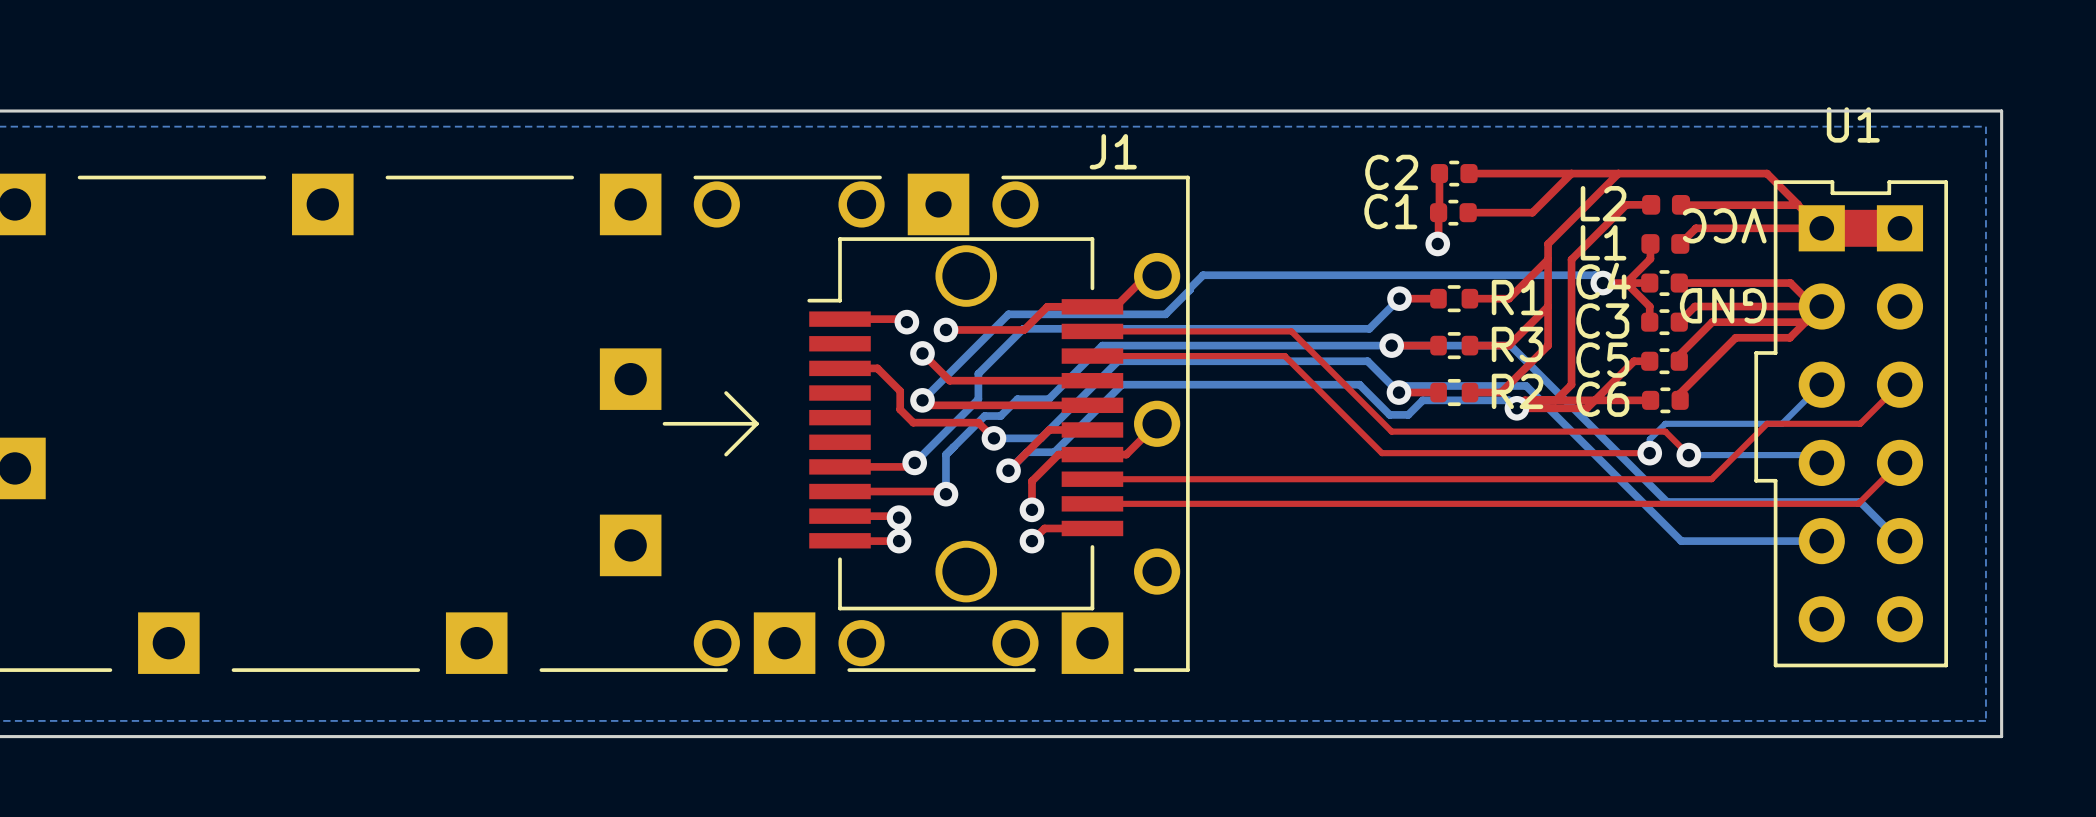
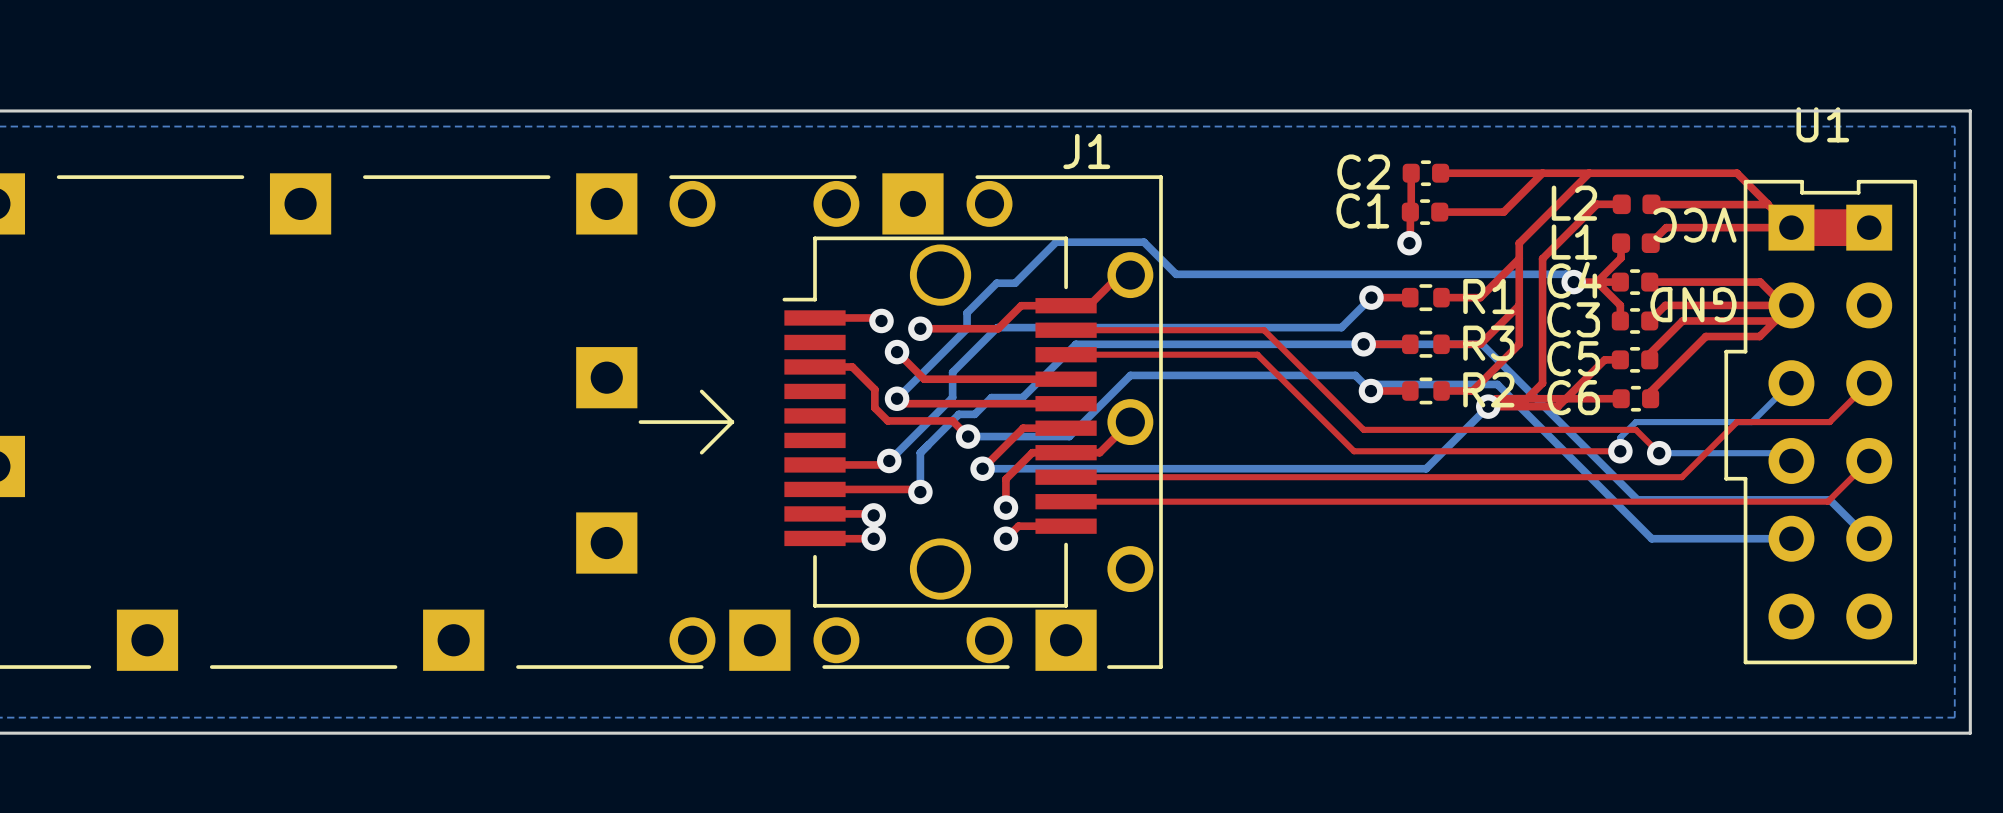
bottom track: (1203, 275) (1165, 314) (1008, 314) (992, 329) -> (1176, 274) (1144, 242) (1056, 242) (1015, 283) (996, 283) (967, 312) (967, 328)
bottom track: (1383, 376) (1367, 361) (1118, 361) (1040, 438) -> (1355, 375) (1130, 375) (1069, 436) (1014, 436)
bottom track: (1516, 408) (1508, 400) (1422, 400) (1408, 414) (1389, 414) (1359, 384) (1121, 384) (1054, 452) (1027, 452) (1008, 470) -> (1488, 406) (1426, 468) (982, 468)

